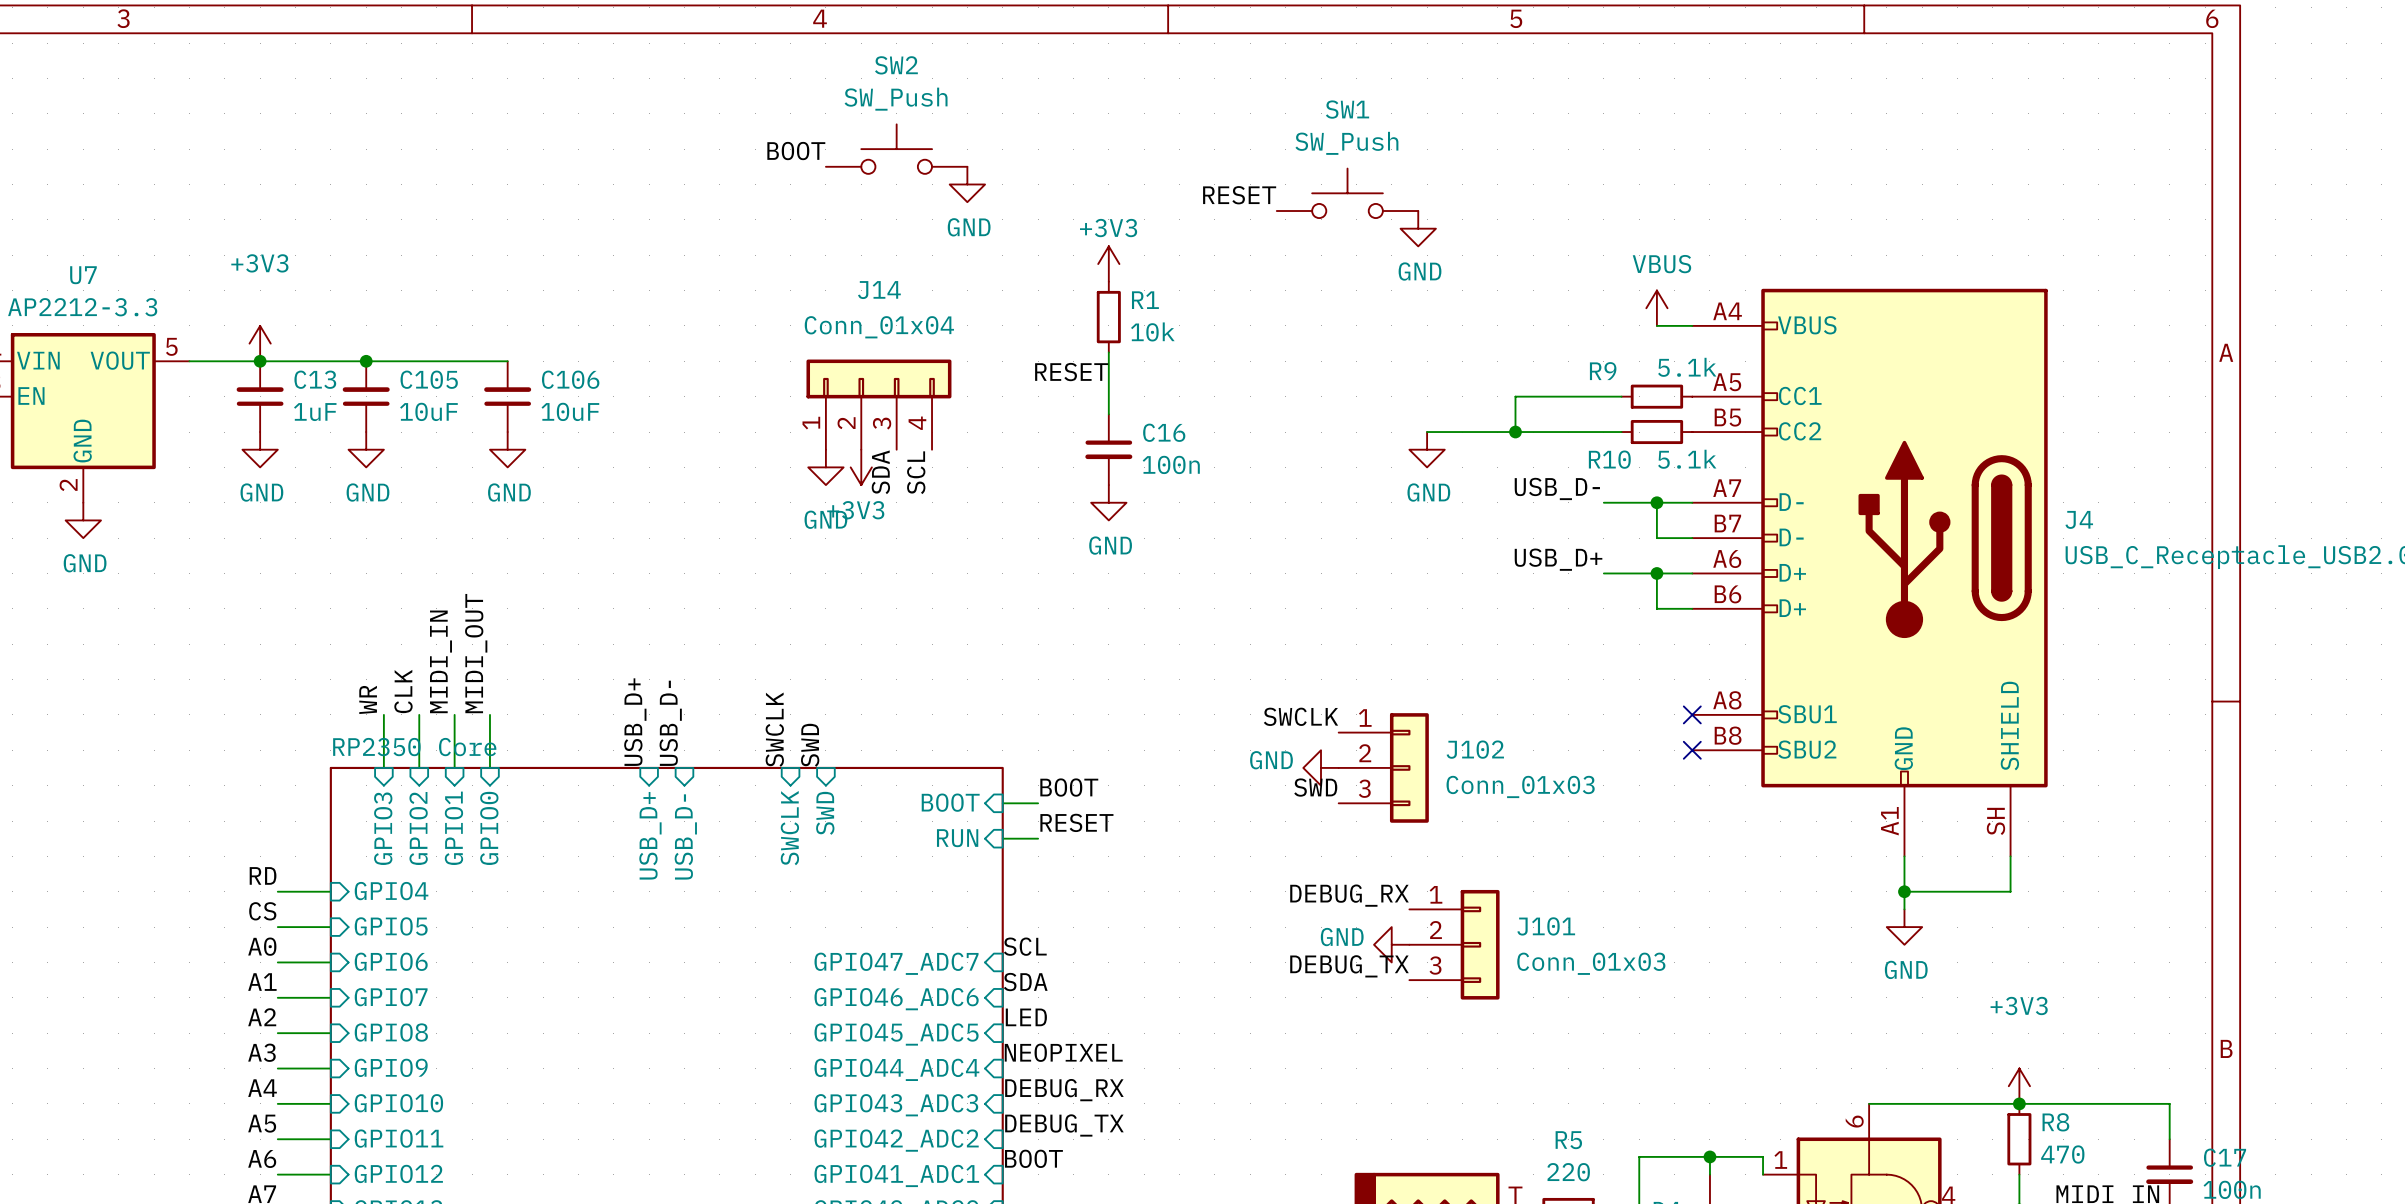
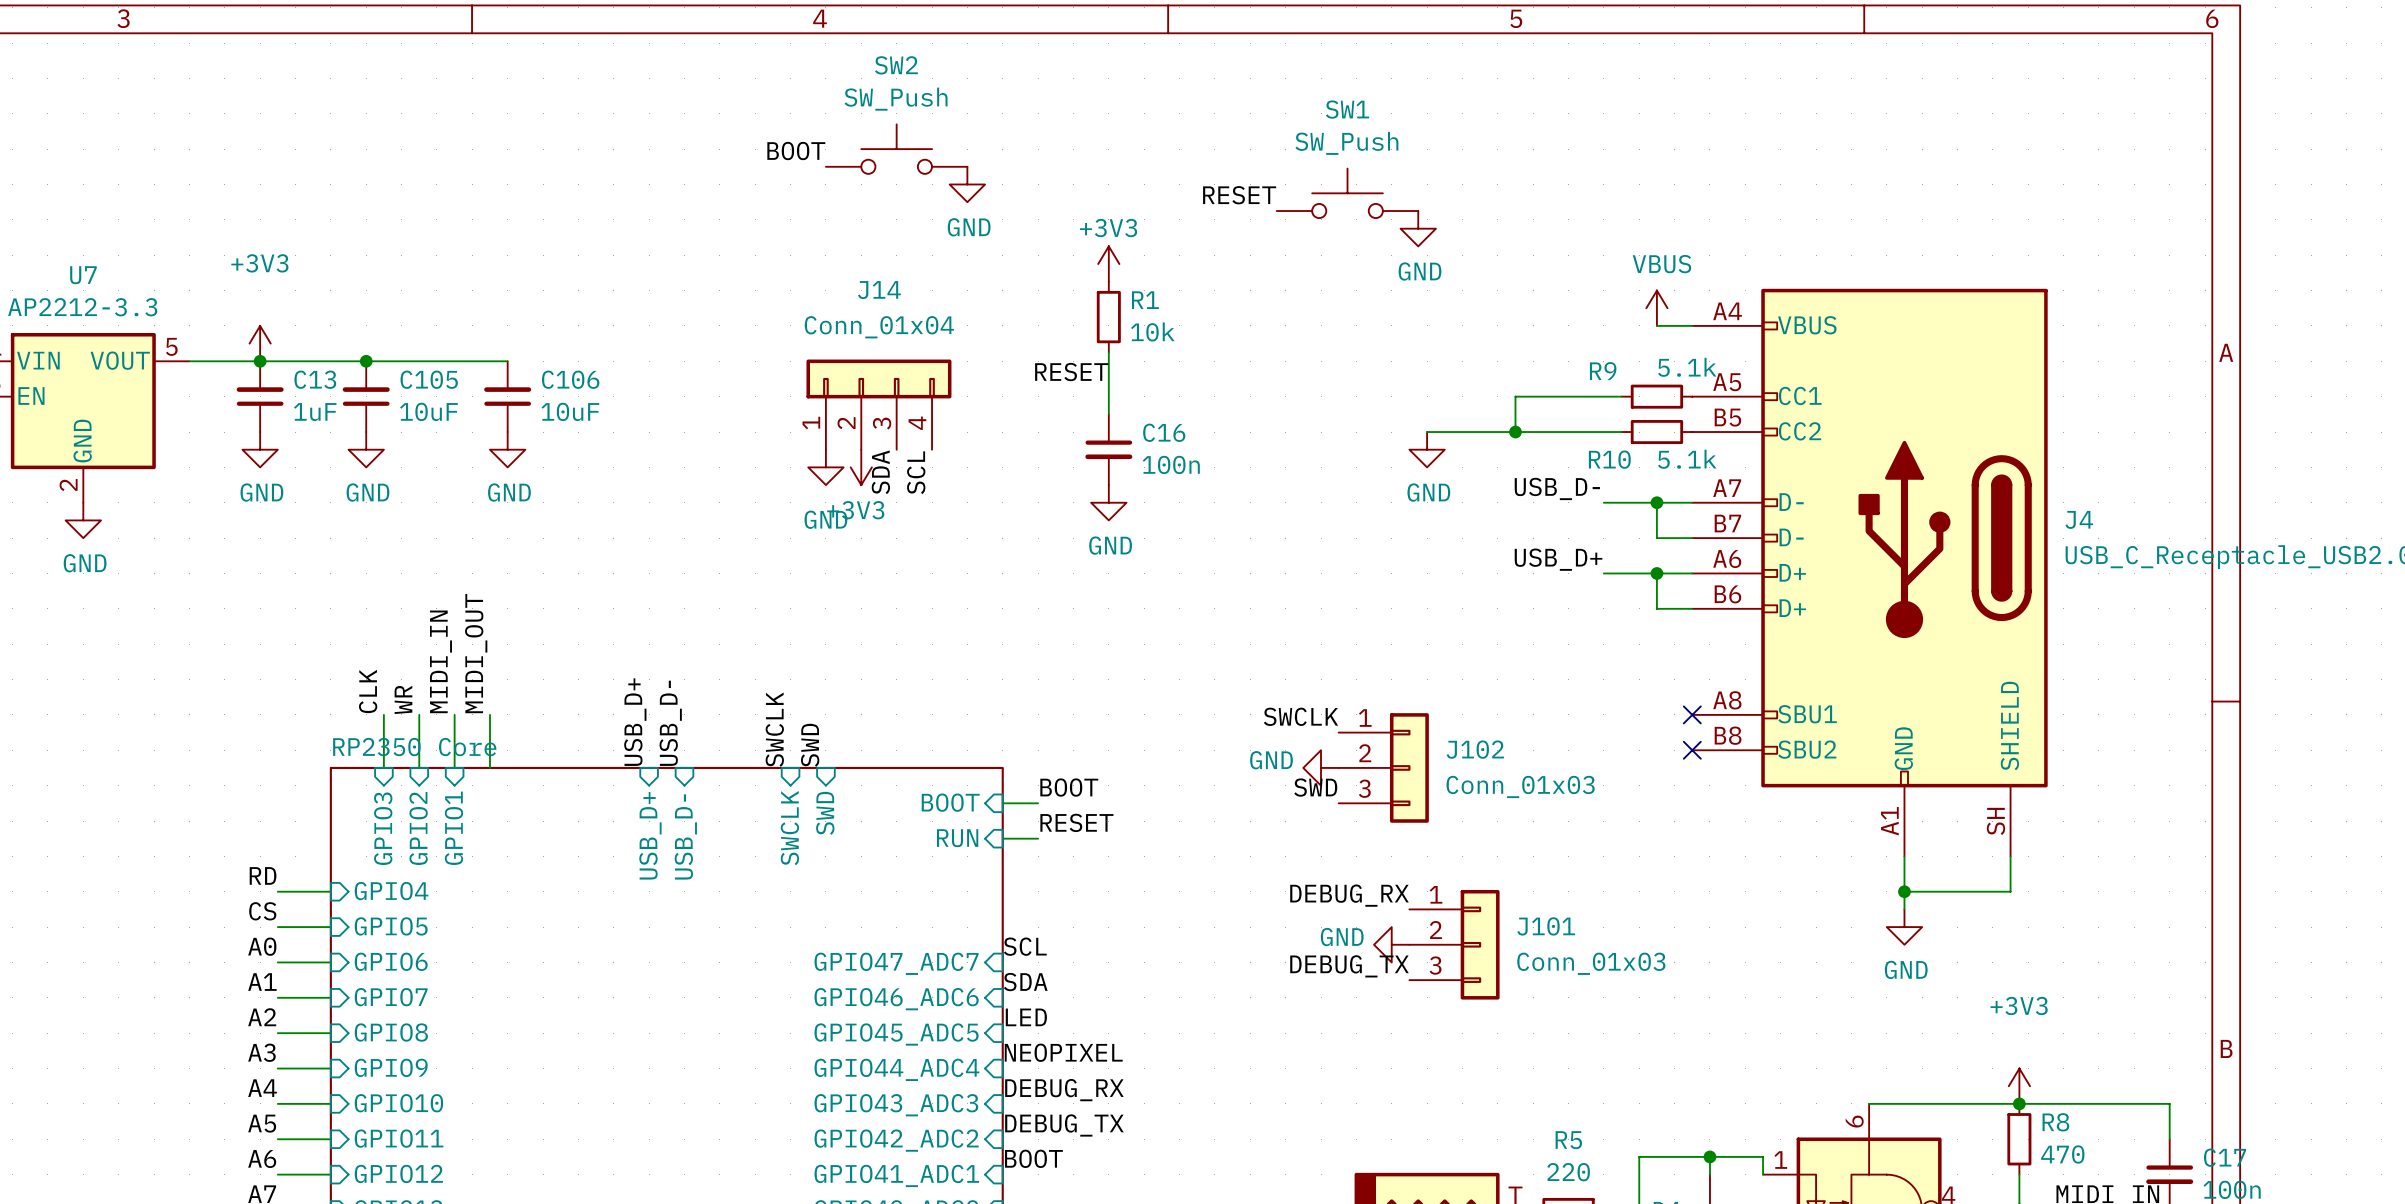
label: CLK (403, 691) -> WR (403, 699)
label: WR (368, 699) -> CLK (368, 691)
sheet pin: GPIO0 (489, 828) -> none

